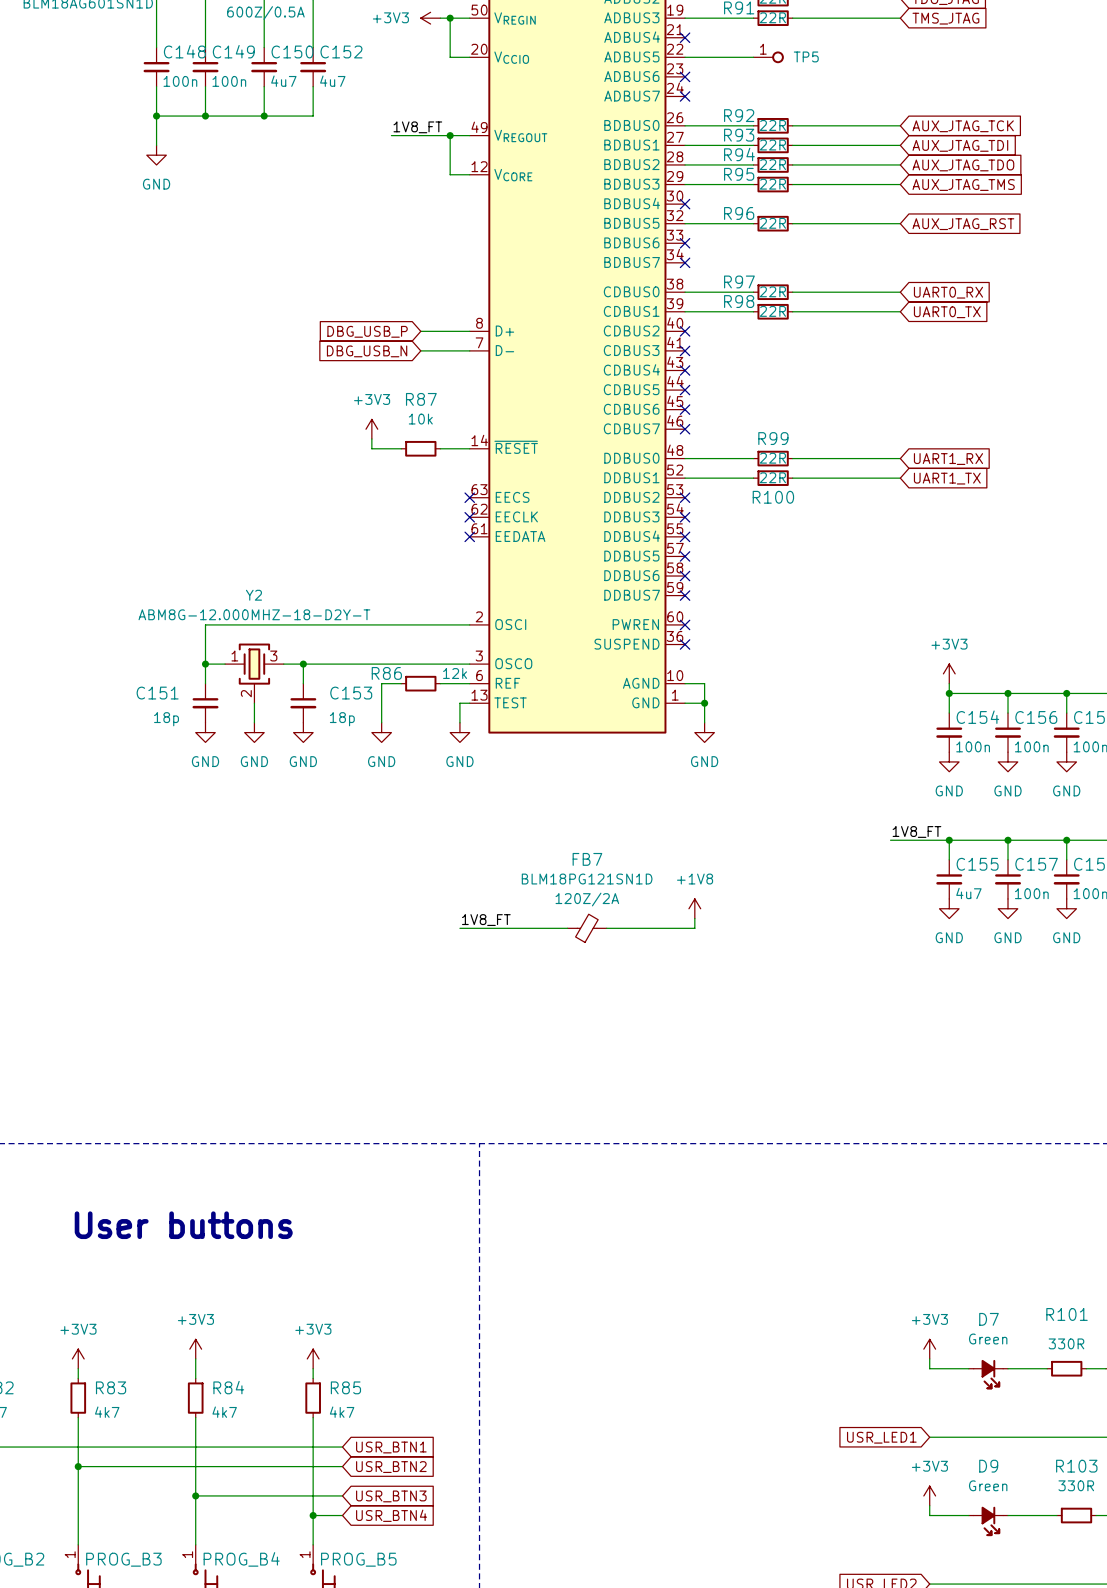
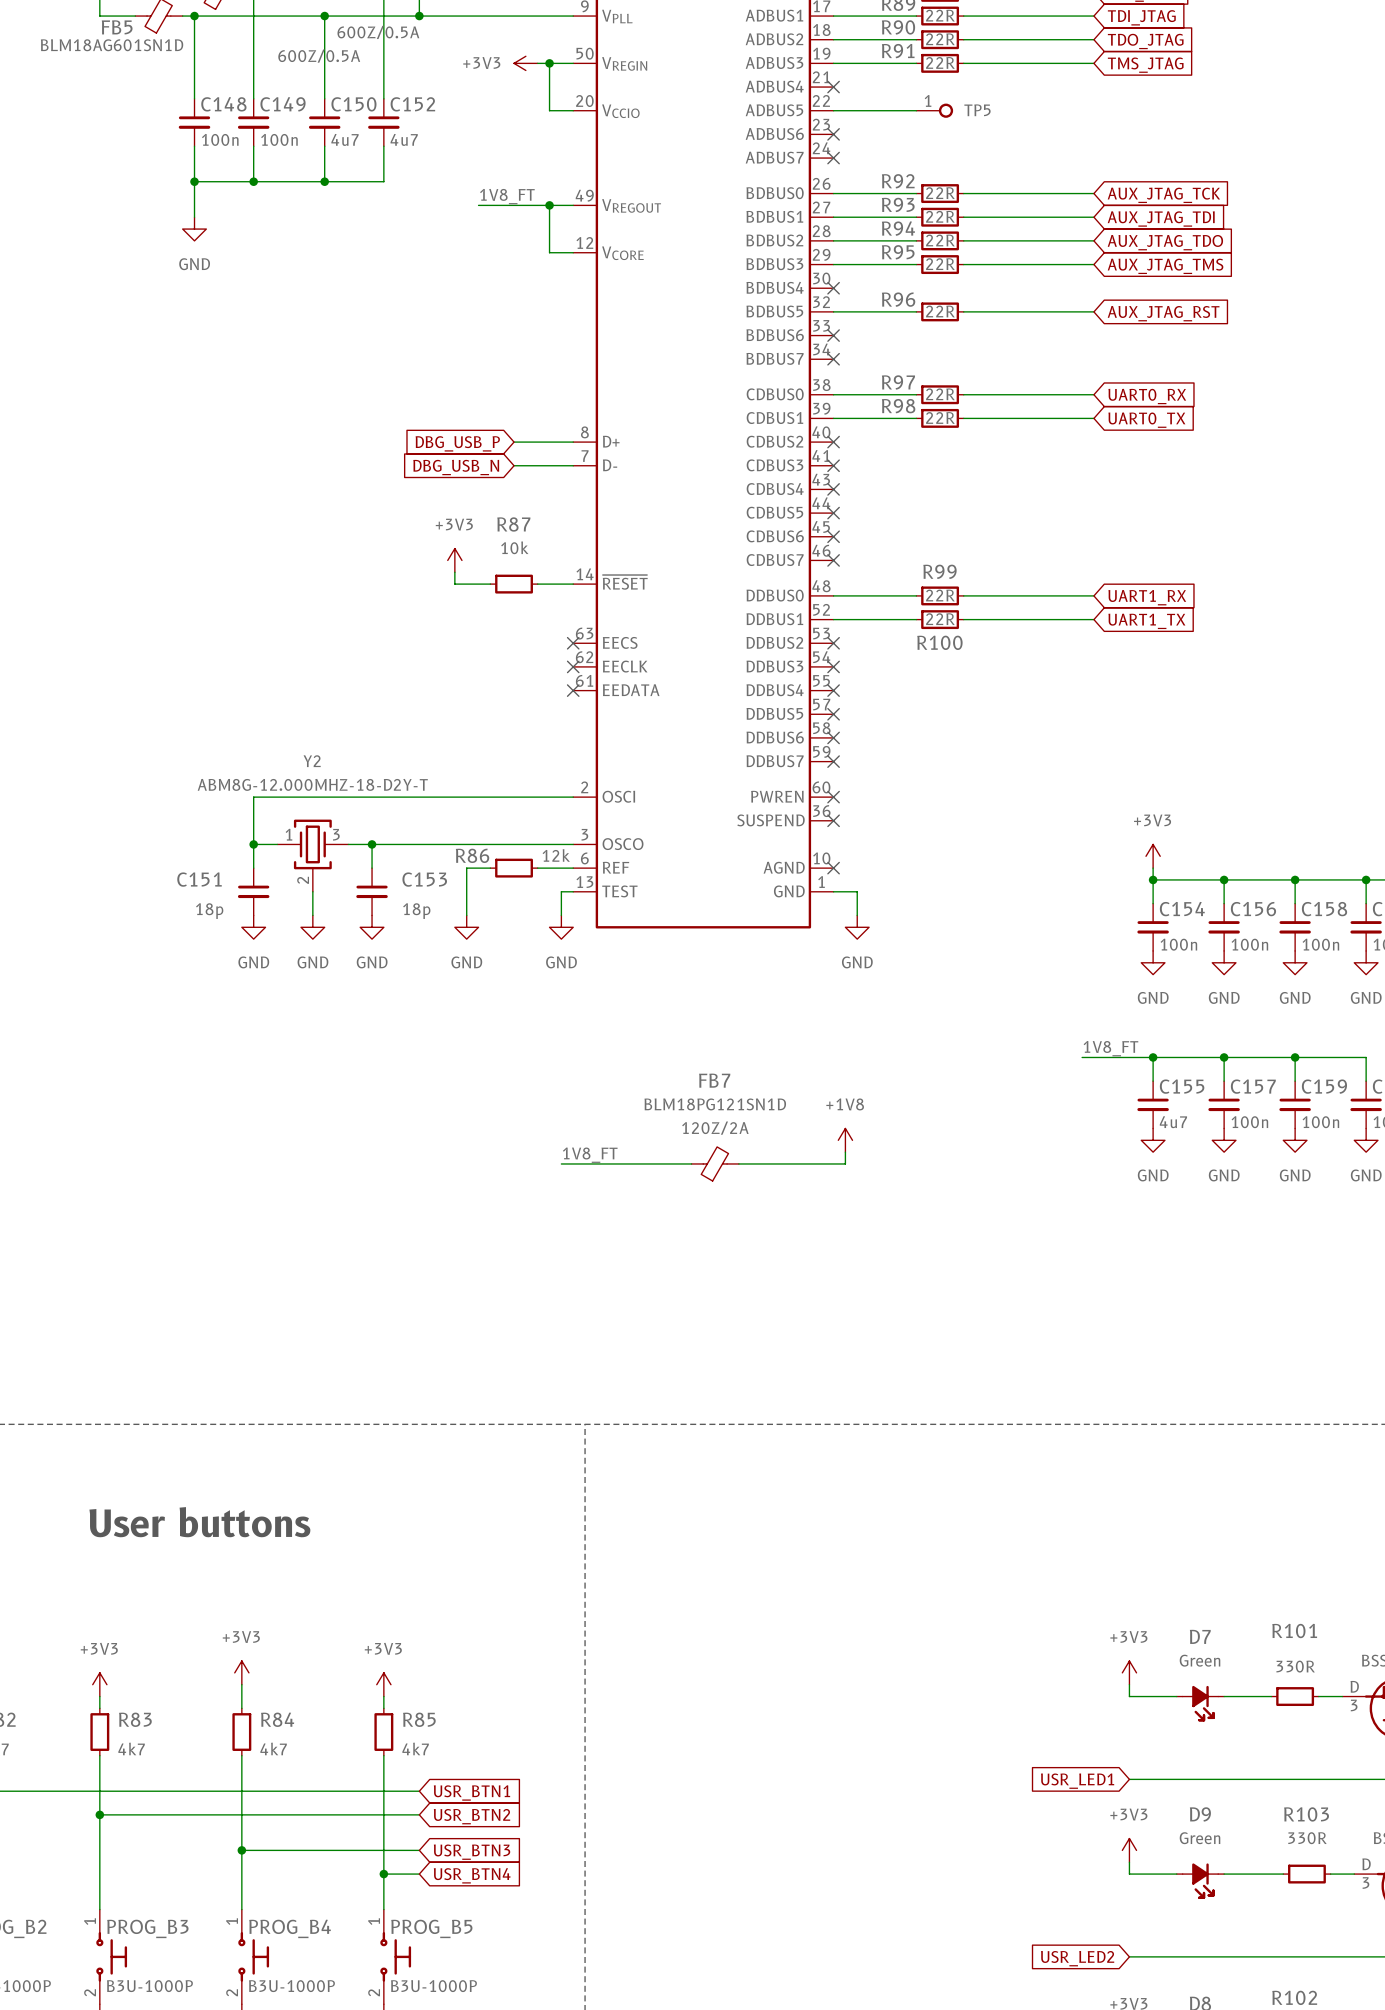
wire: (685, 683) (704, 683) (704, 703) -> none
no-connect mark: none -> (833, 868)
junction: (704, 703) -> none

